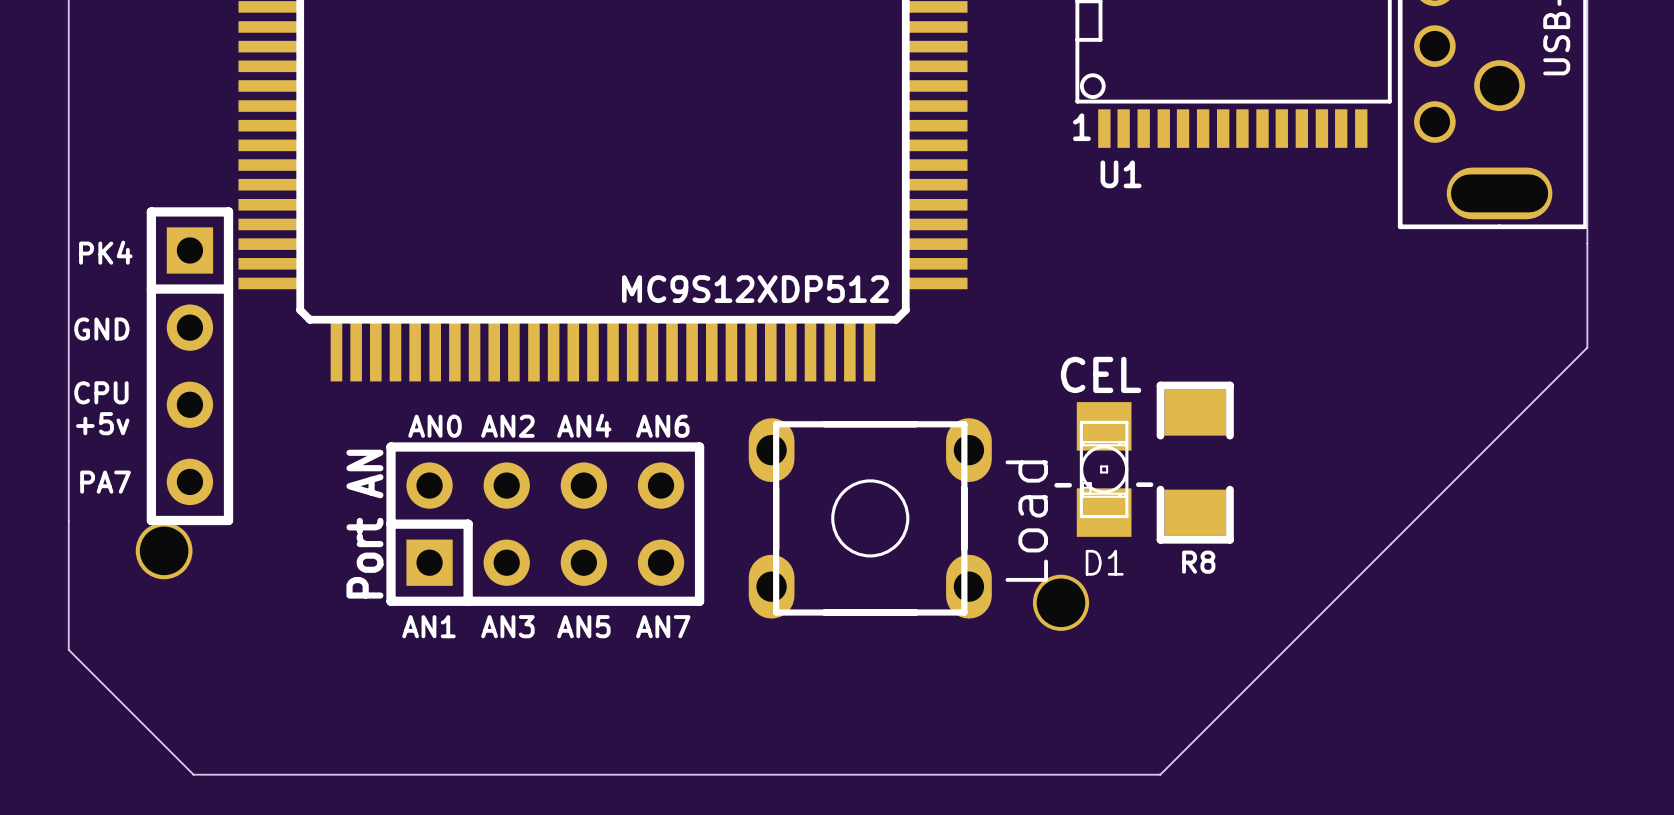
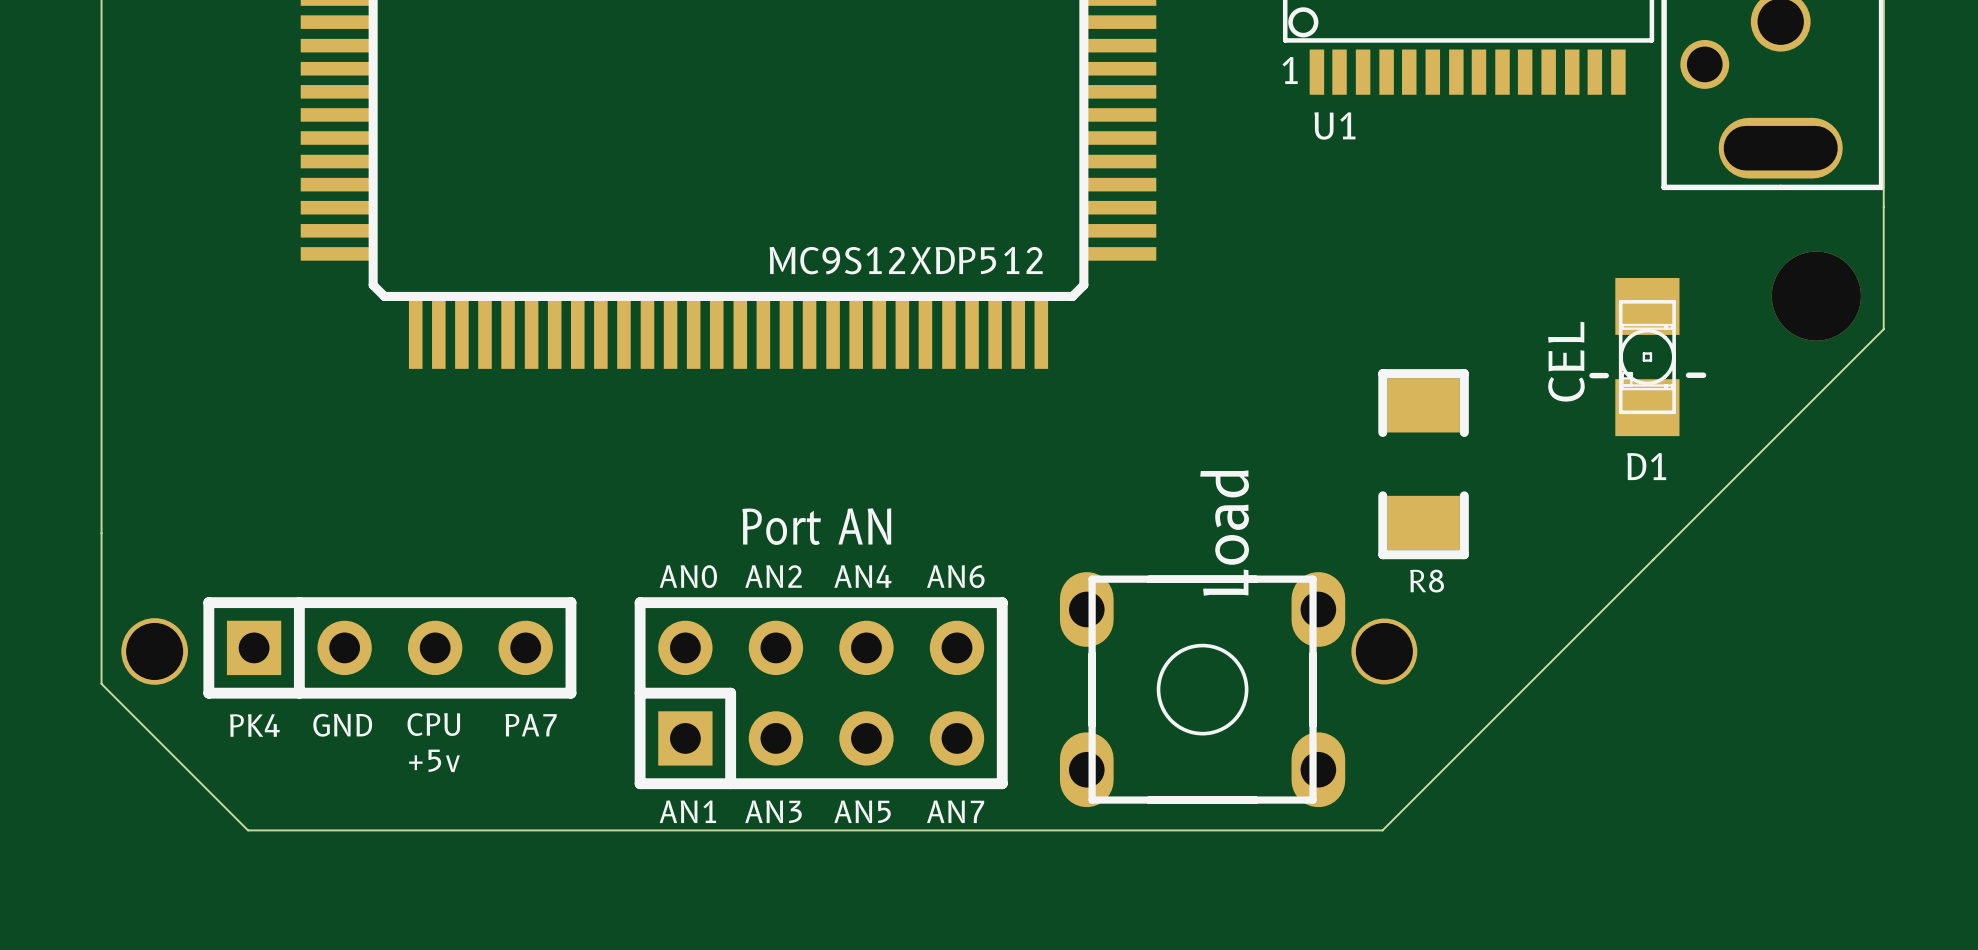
text position: PK4 (105, 252) -> PK4 (254, 725)
part: none -> (1816, 296)
text position: GND (101, 329) -> GND (342, 725)
part rotation: 0° (189, 366) -> 90° counterclockwise (389, 647)
part position: (189, 366) -> (389, 647)
text rotation: 0° (1101, 374) -> 90° counterclockwise (1566, 361)
text position: CEL (1101, 374) -> CEL (1566, 361)
text position: CPU (101, 392) -> CPU (433, 724)
text position: +5v (102, 423) -> +5v (434, 760)
text position: AN4 (584, 425) -> AN4 (862, 576)
text position: AN0 (435, 426) -> AN0 (688, 576)
text position: AN2 (507, 426) -> AN2 (773, 576)
text position: AN6 (662, 426) -> AN6 (955, 576)
D1 position: (1104, 469) -> (1647, 357)
text position: PA7 (105, 482) -> PA7 (531, 725)
line: (1138, 484) (1151, 484) -> (1688, 375) (1703, 375)
line: (1056, 485) (1059, 485) -> (1592, 375) (1595, 375)
line: (1061, 485) (1069, 485) -> (1596, 375) (1606, 375)
part position: (870, 518) -> (1202, 689)
text rotation: 0° (364, 524) -> 90° clockwise (816, 526)
text position: Port AN (364, 524) -> Port AN (816, 526)
part position: (545, 524) -> (821, 693)
part position: (164, 550) -> (154, 651)
part position: (1061, 602) -> (1384, 651)
text position: AN1 (428, 626) -> AN1 (687, 811)
text position: AN3 (507, 626) -> AN3 (773, 811)
text position: AN5 (583, 626) -> AN5 (862, 811)
text position: AN7 (663, 626) -> AN7 (955, 811)

